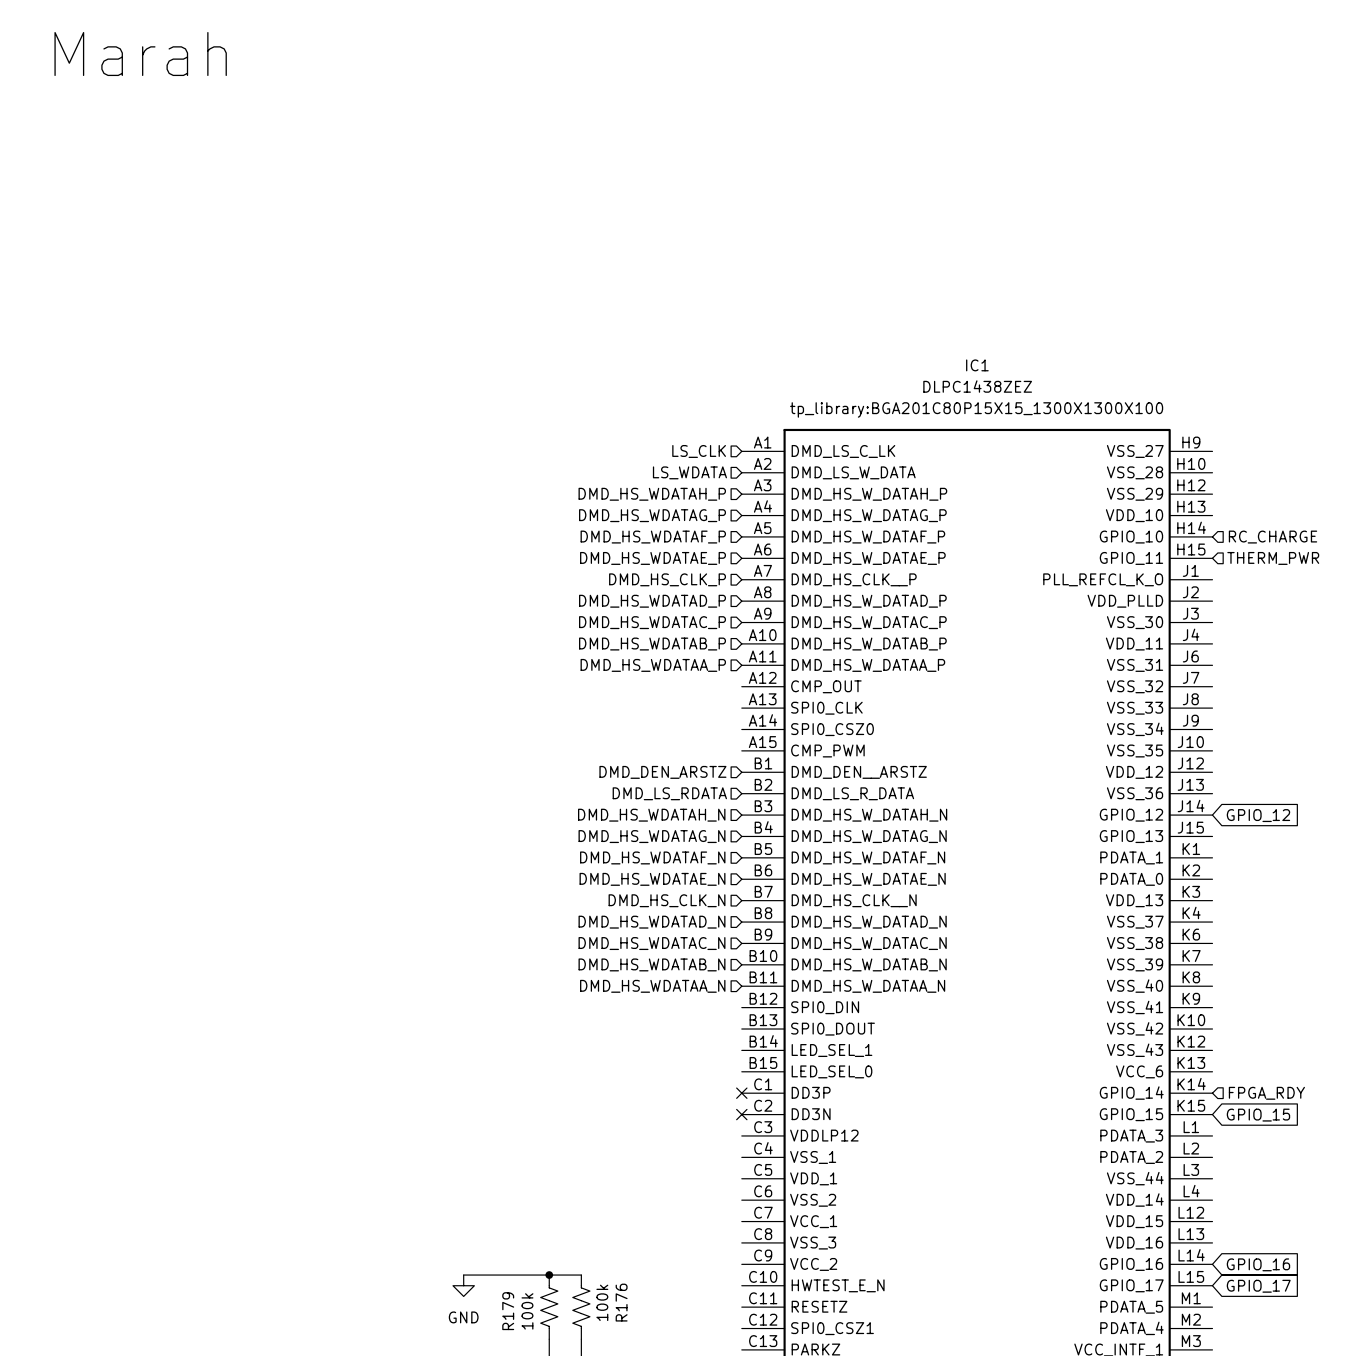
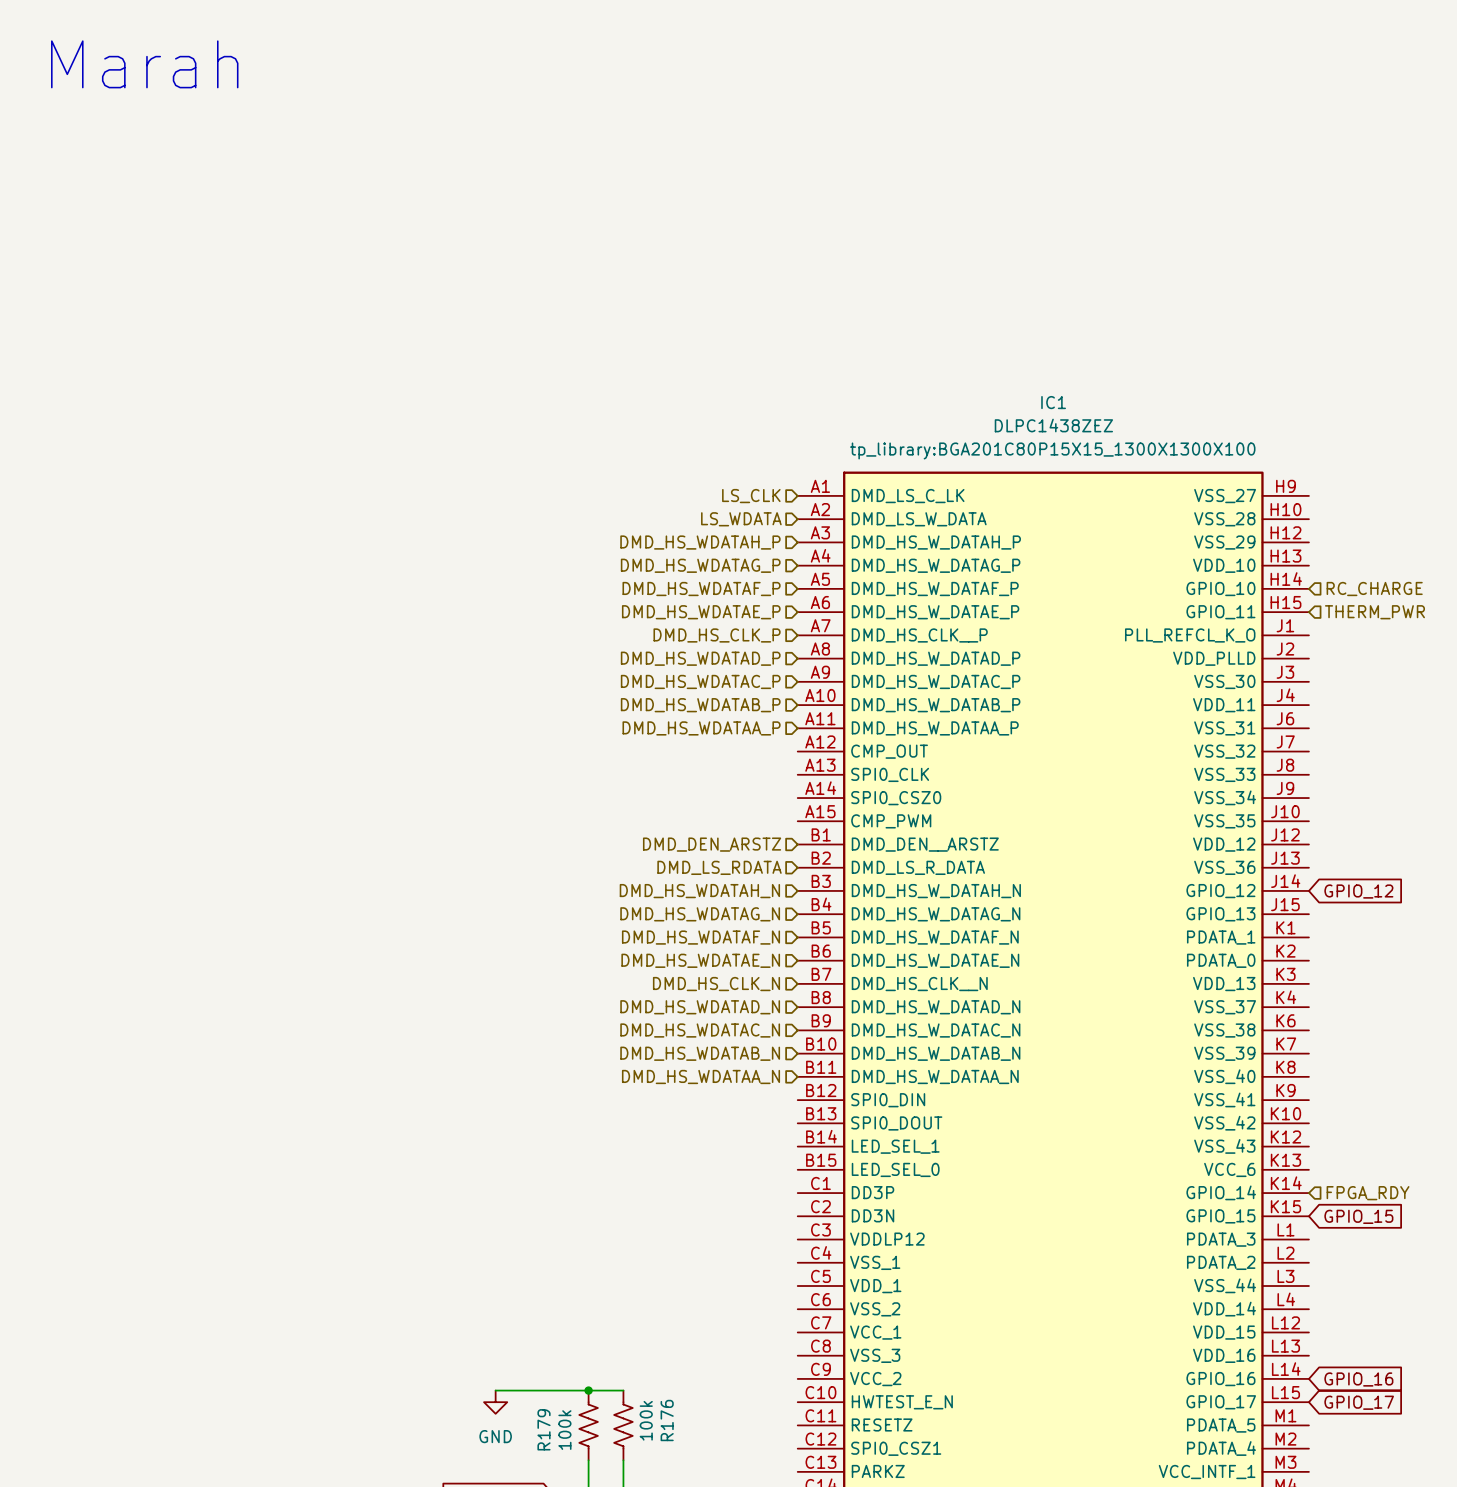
no-connect mark: (741, 1093) -> none
no-connect mark: (741, 1114) -> none

